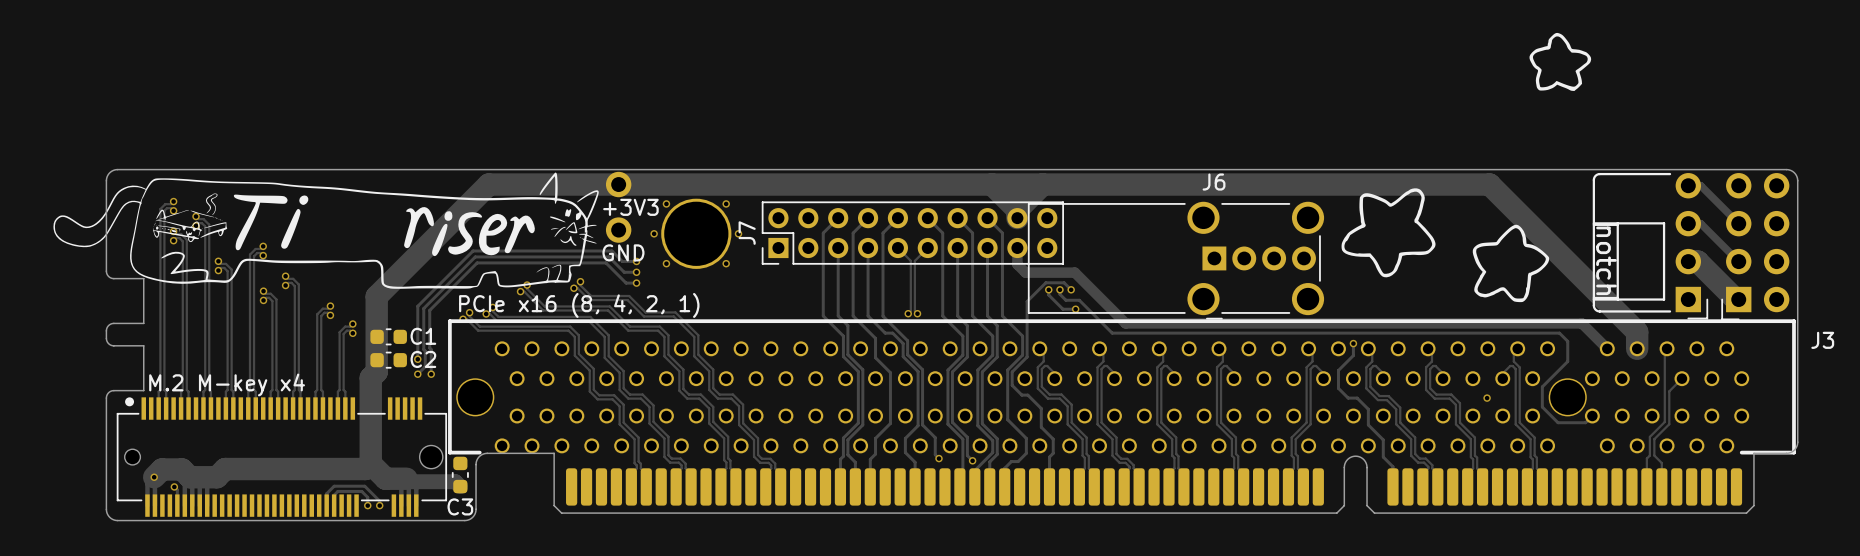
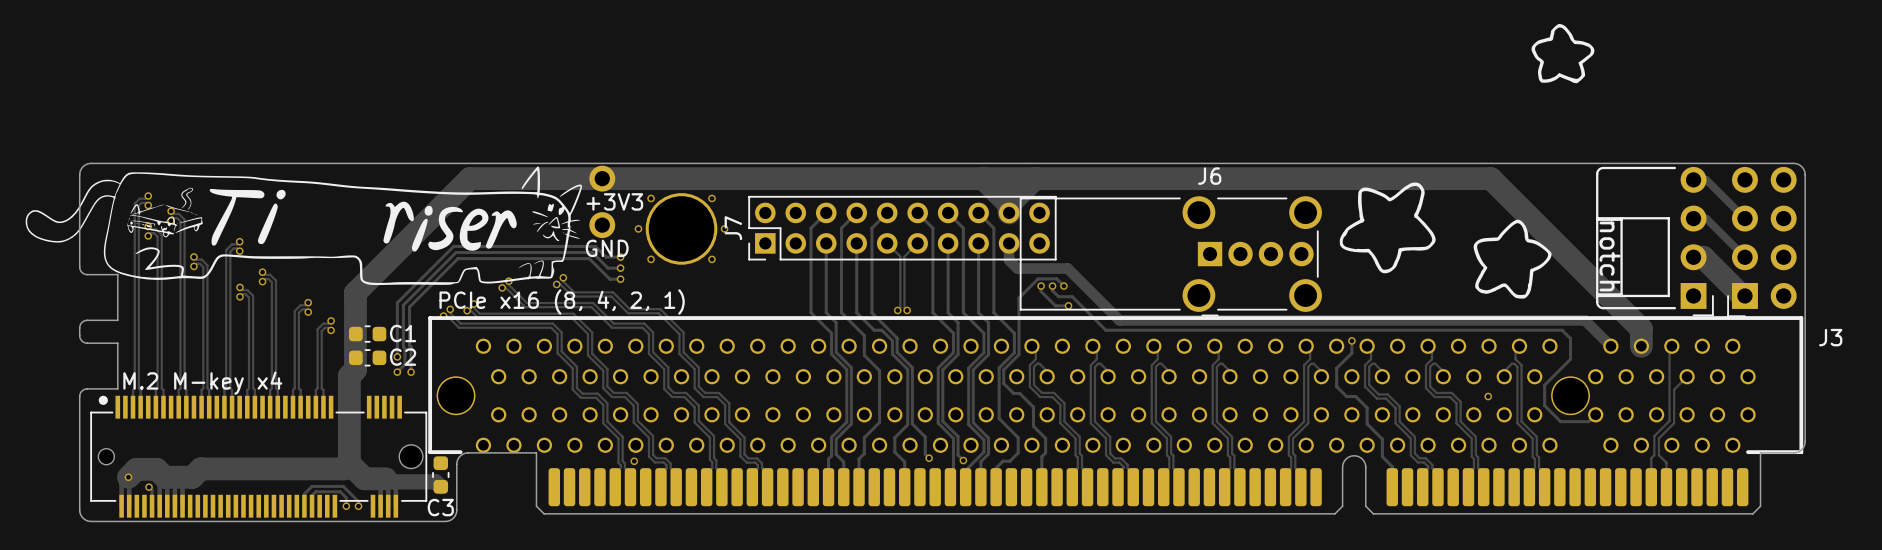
via: none -> (634, 461)

